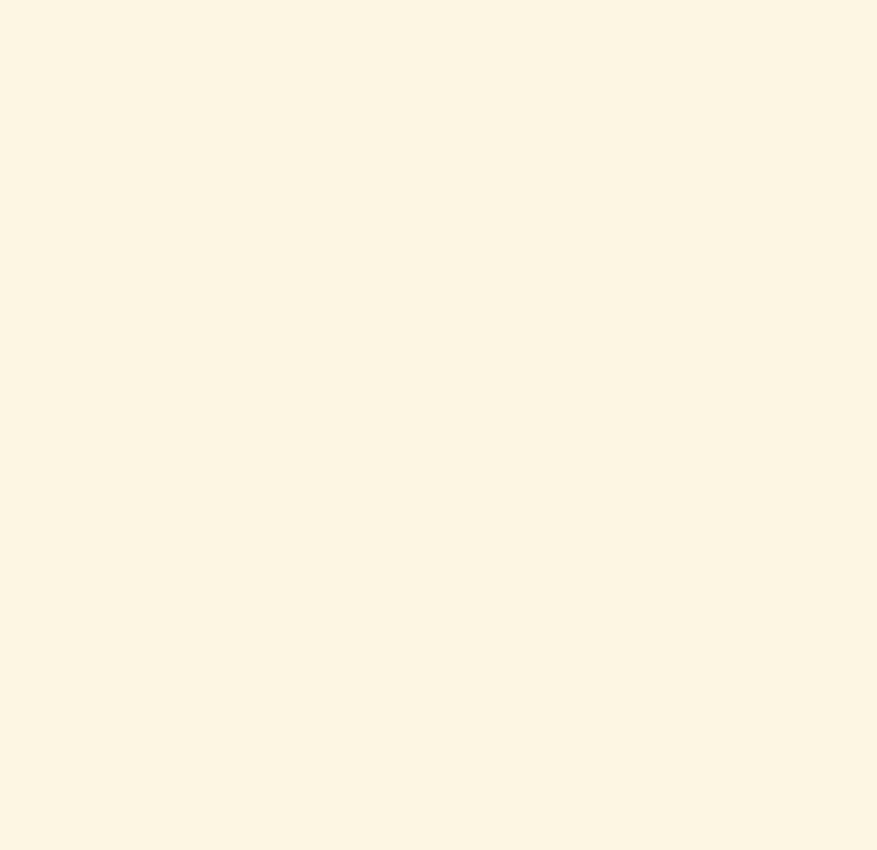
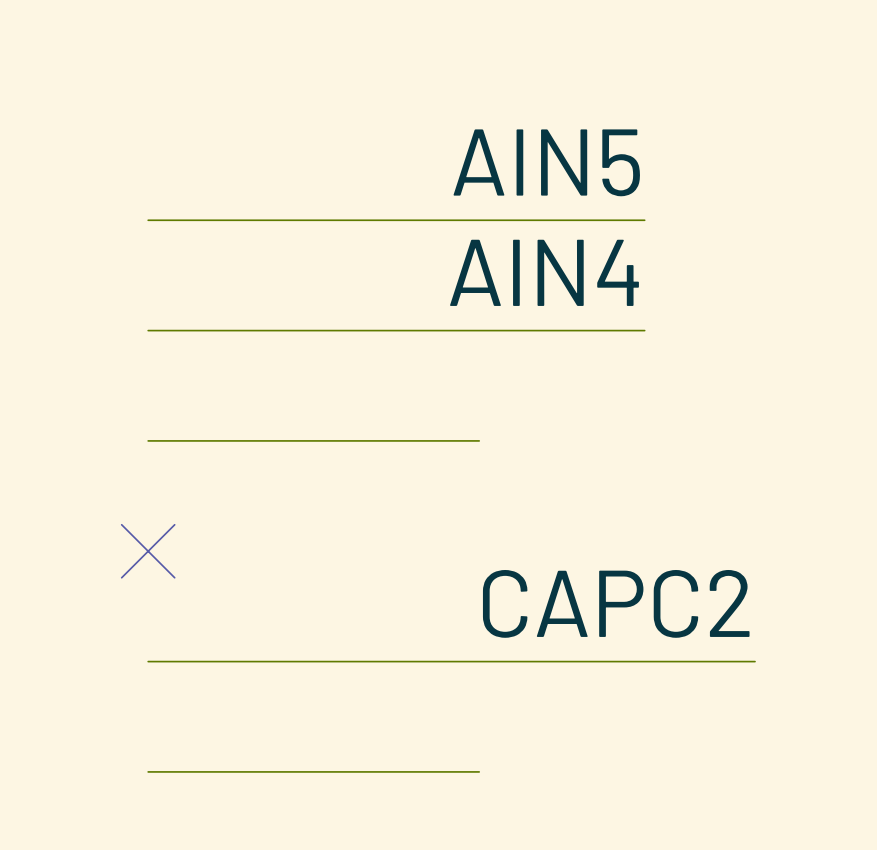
label: none -> AIN5 (546, 162)
wire: none -> (148, 220) (644, 220)
label: none -> AIN4 (544, 272)
wire: none -> (148, 330) (644, 330)
wire: none -> (148, 440) (479, 440)
no-connect mark: none -> (148, 551)
label: none -> CAPC2 (616, 603)
wire: none -> (148, 661) (755, 661)
wire: none -> (148, 771) (479, 771)

